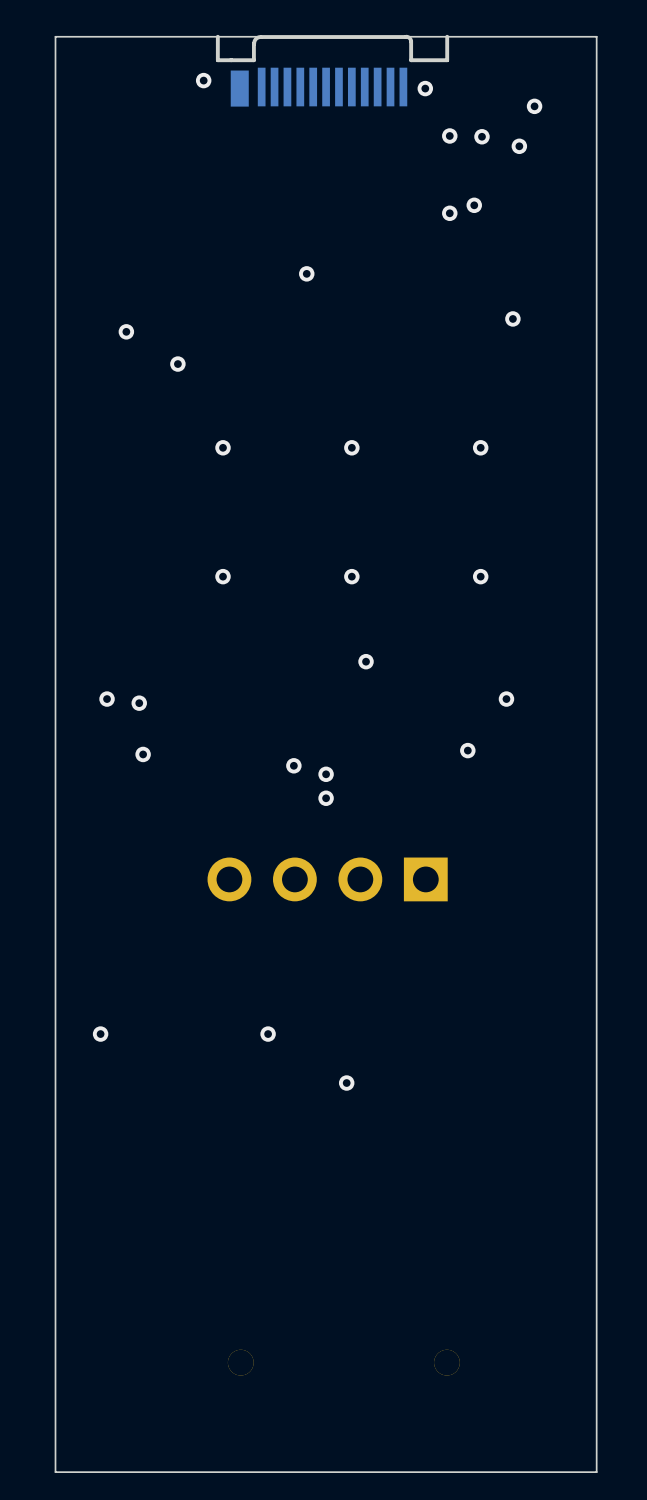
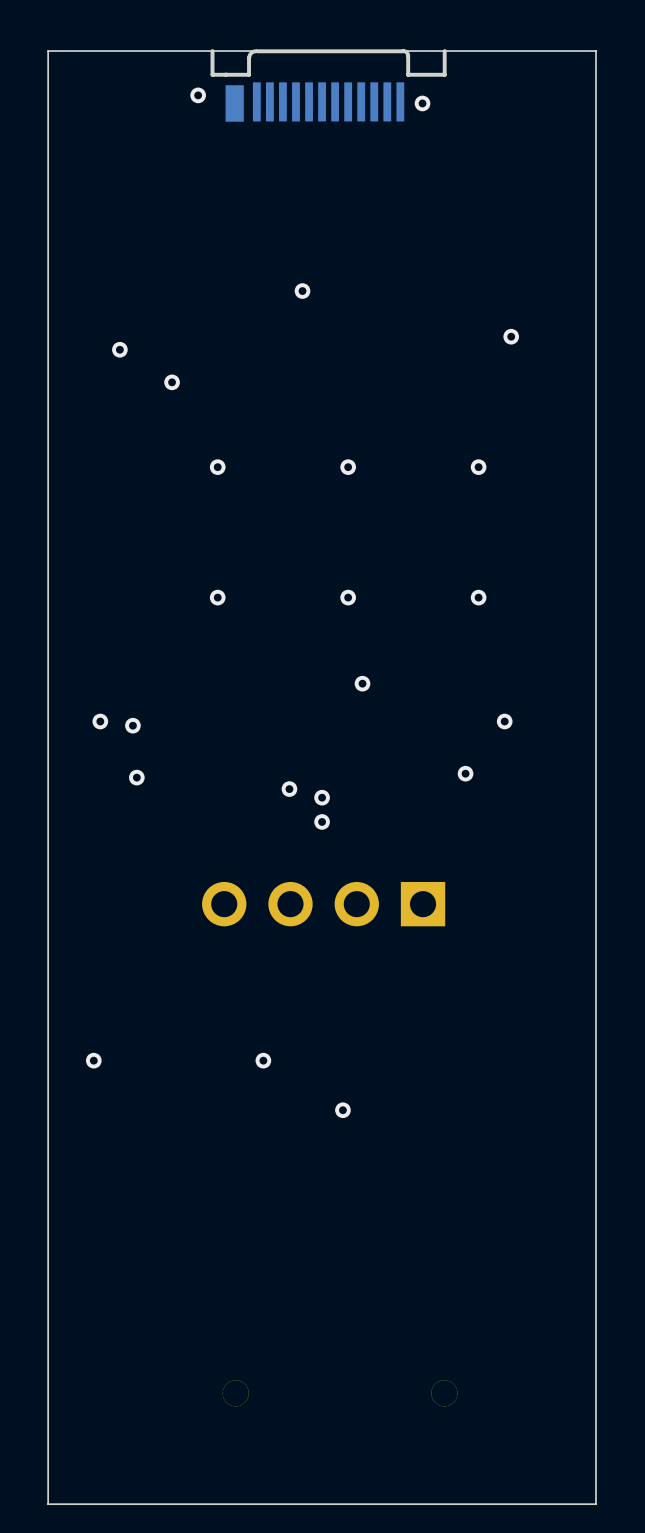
via: (534, 106) -> none
via: (449, 135) -> none
via: (481, 136) -> none
via: (519, 146) -> none
via: (474, 205) -> none
via: (449, 213) -> none

